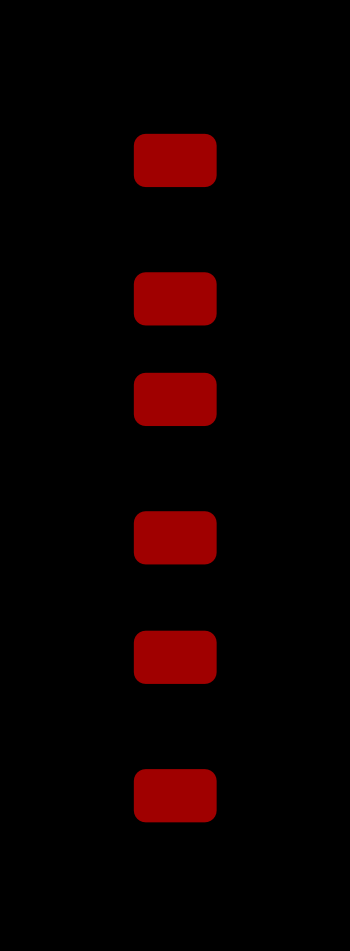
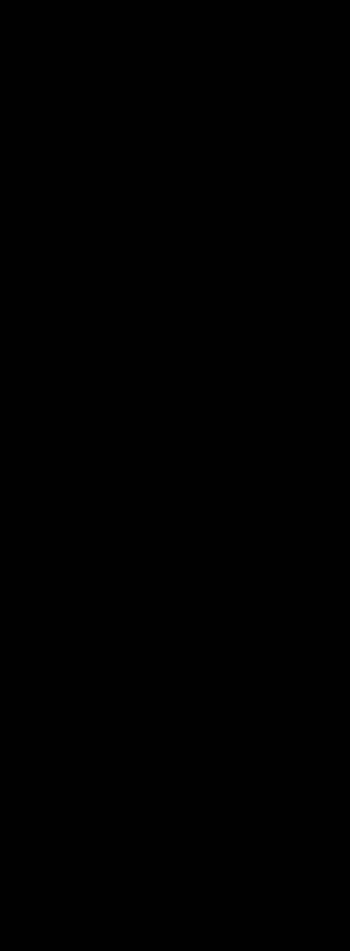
part: (175, 229) -> none
part: (175, 468) -> none
part: (175, 726) -> none

